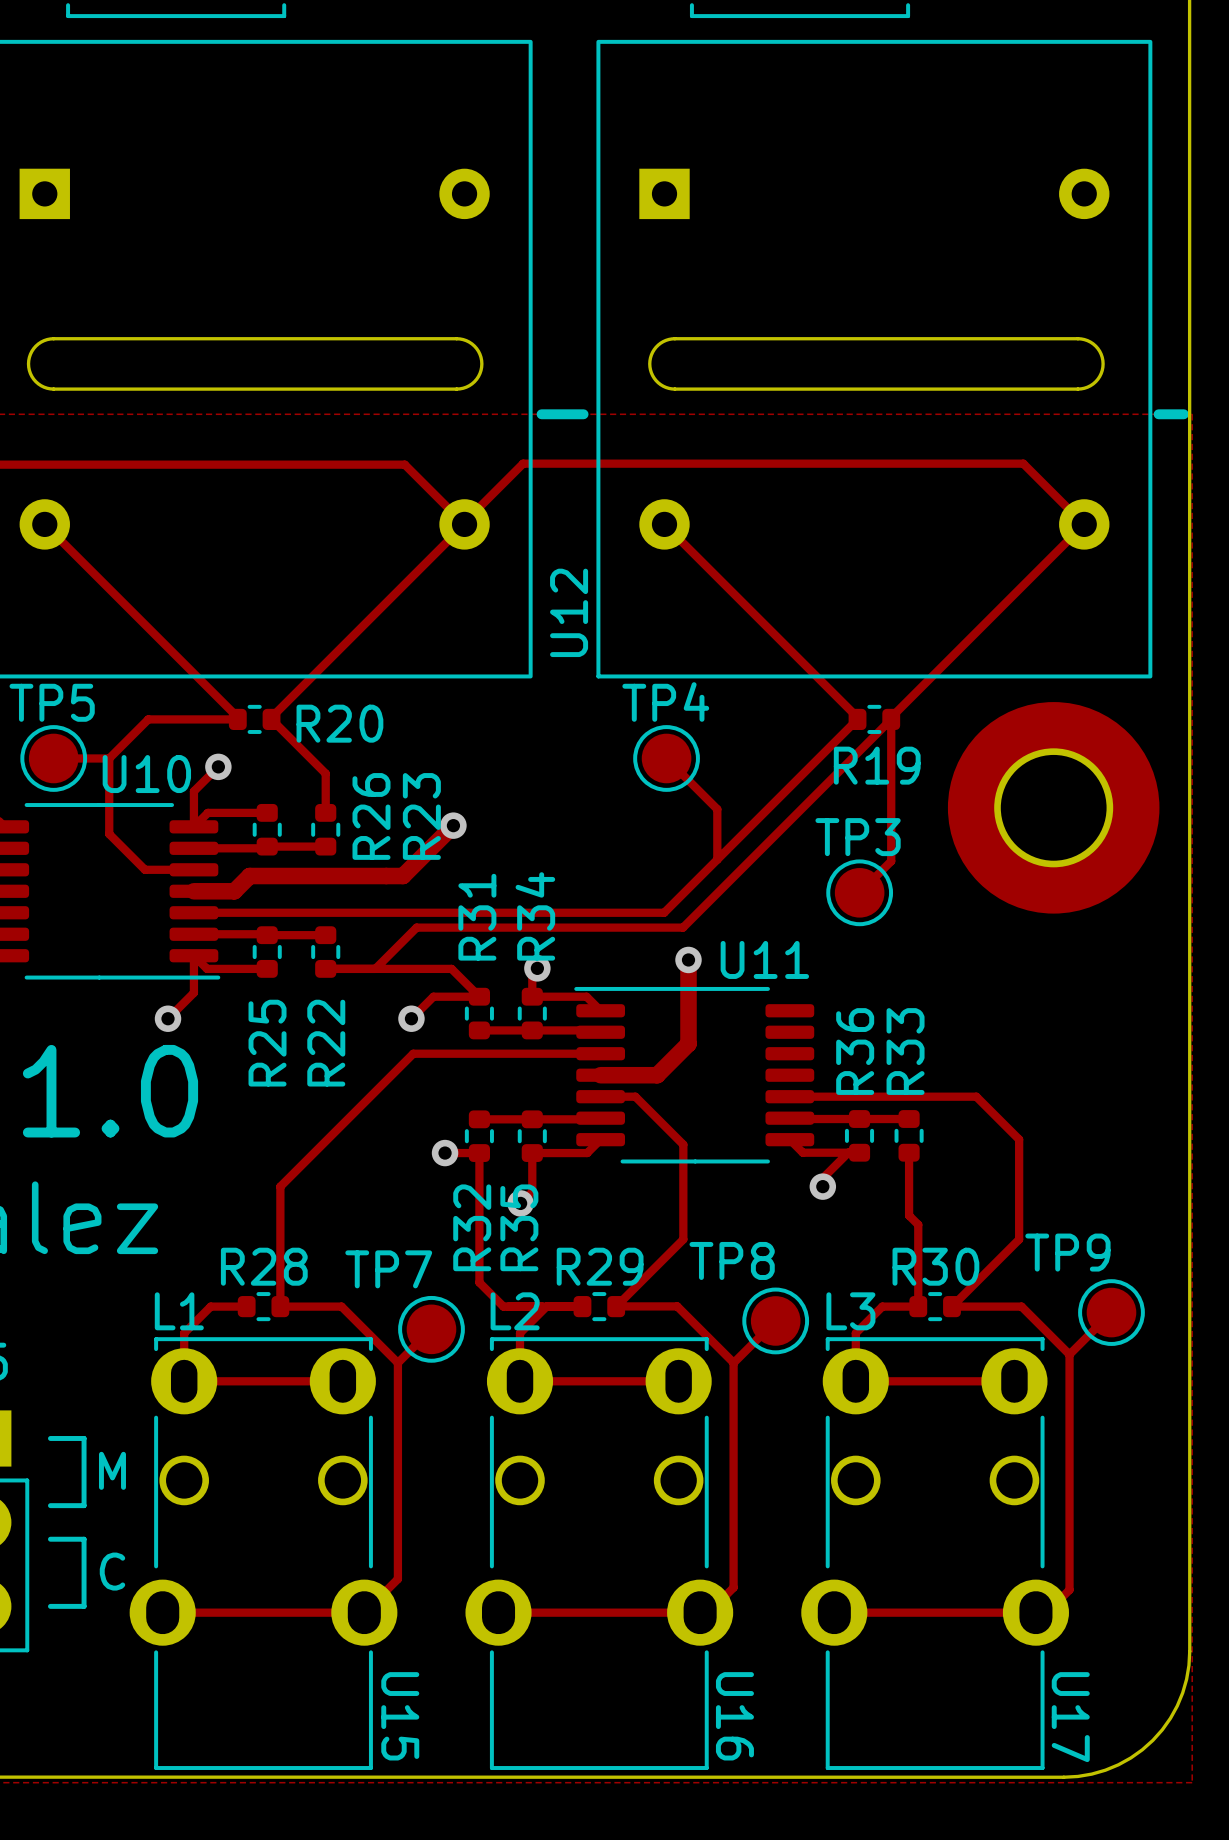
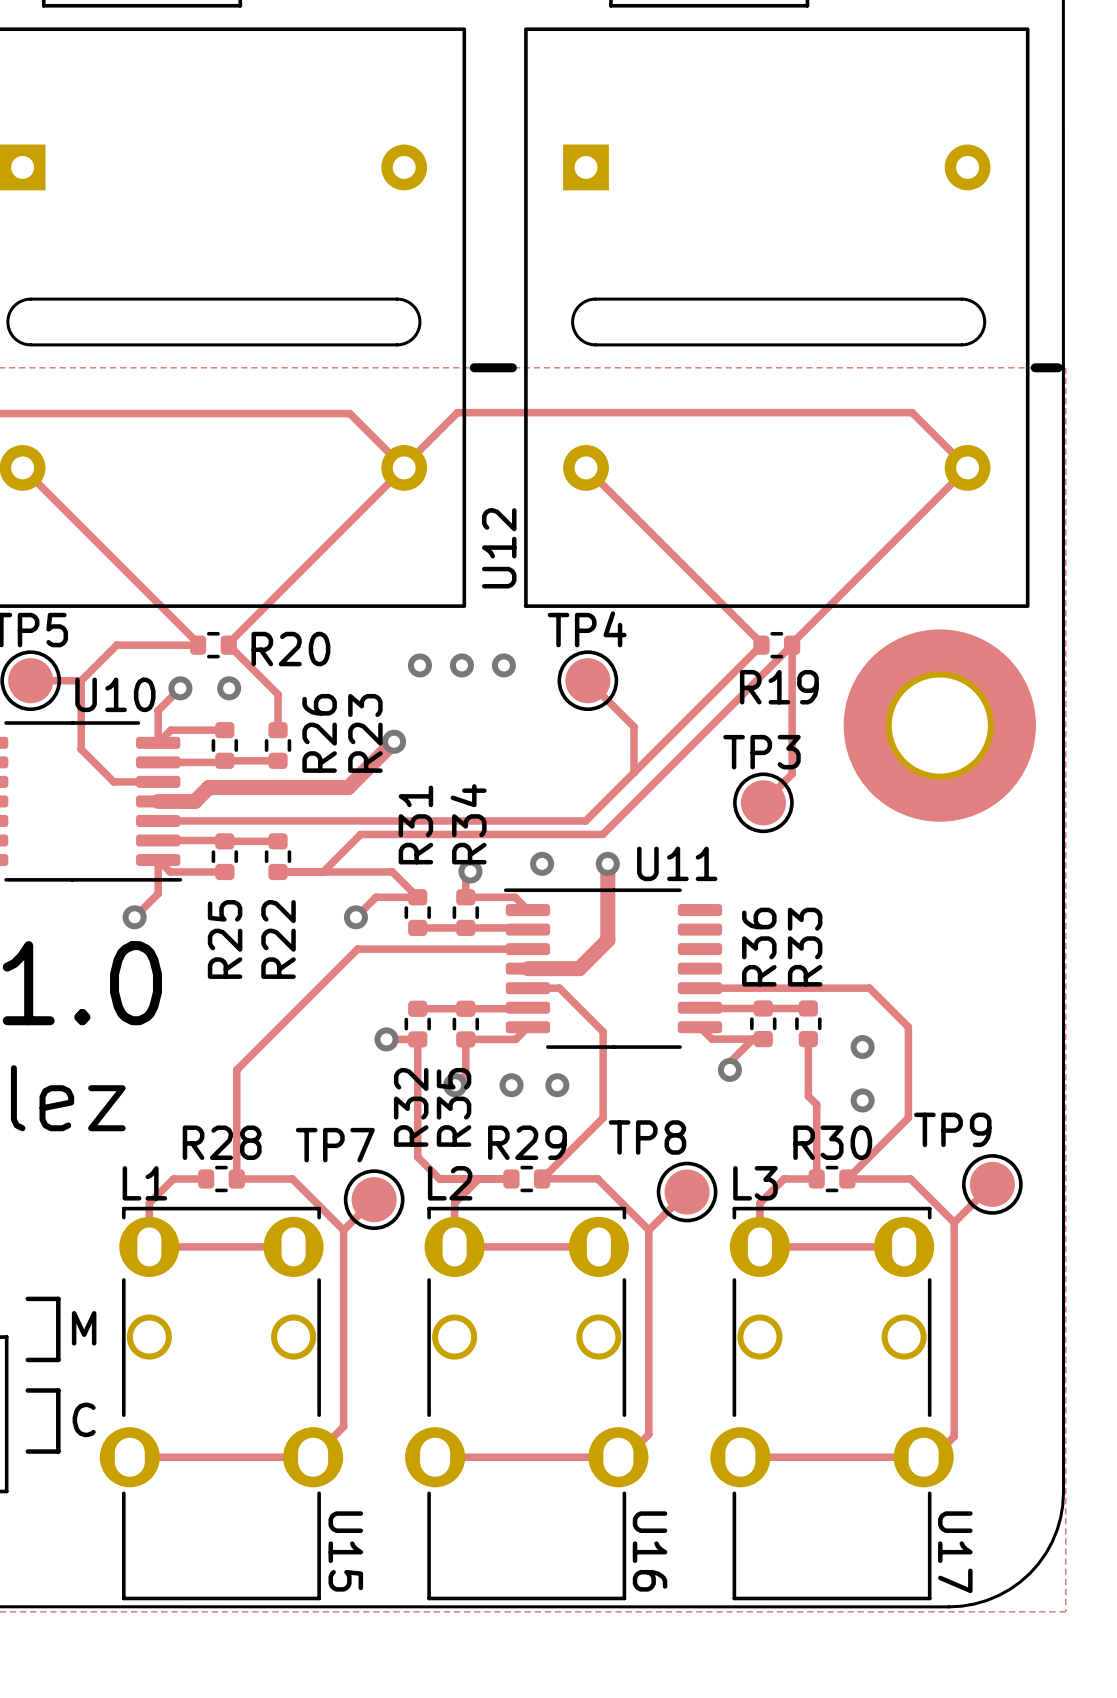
via: none -> (419, 665)
via: none -> (461, 665)
via: none -> (503, 665)
via: none -> (229, 688)
via: none -> (542, 863)
via: none -> (862, 1047)
via: none -> (511, 1085)
via: none -> (557, 1085)
via: none -> (862, 1100)

